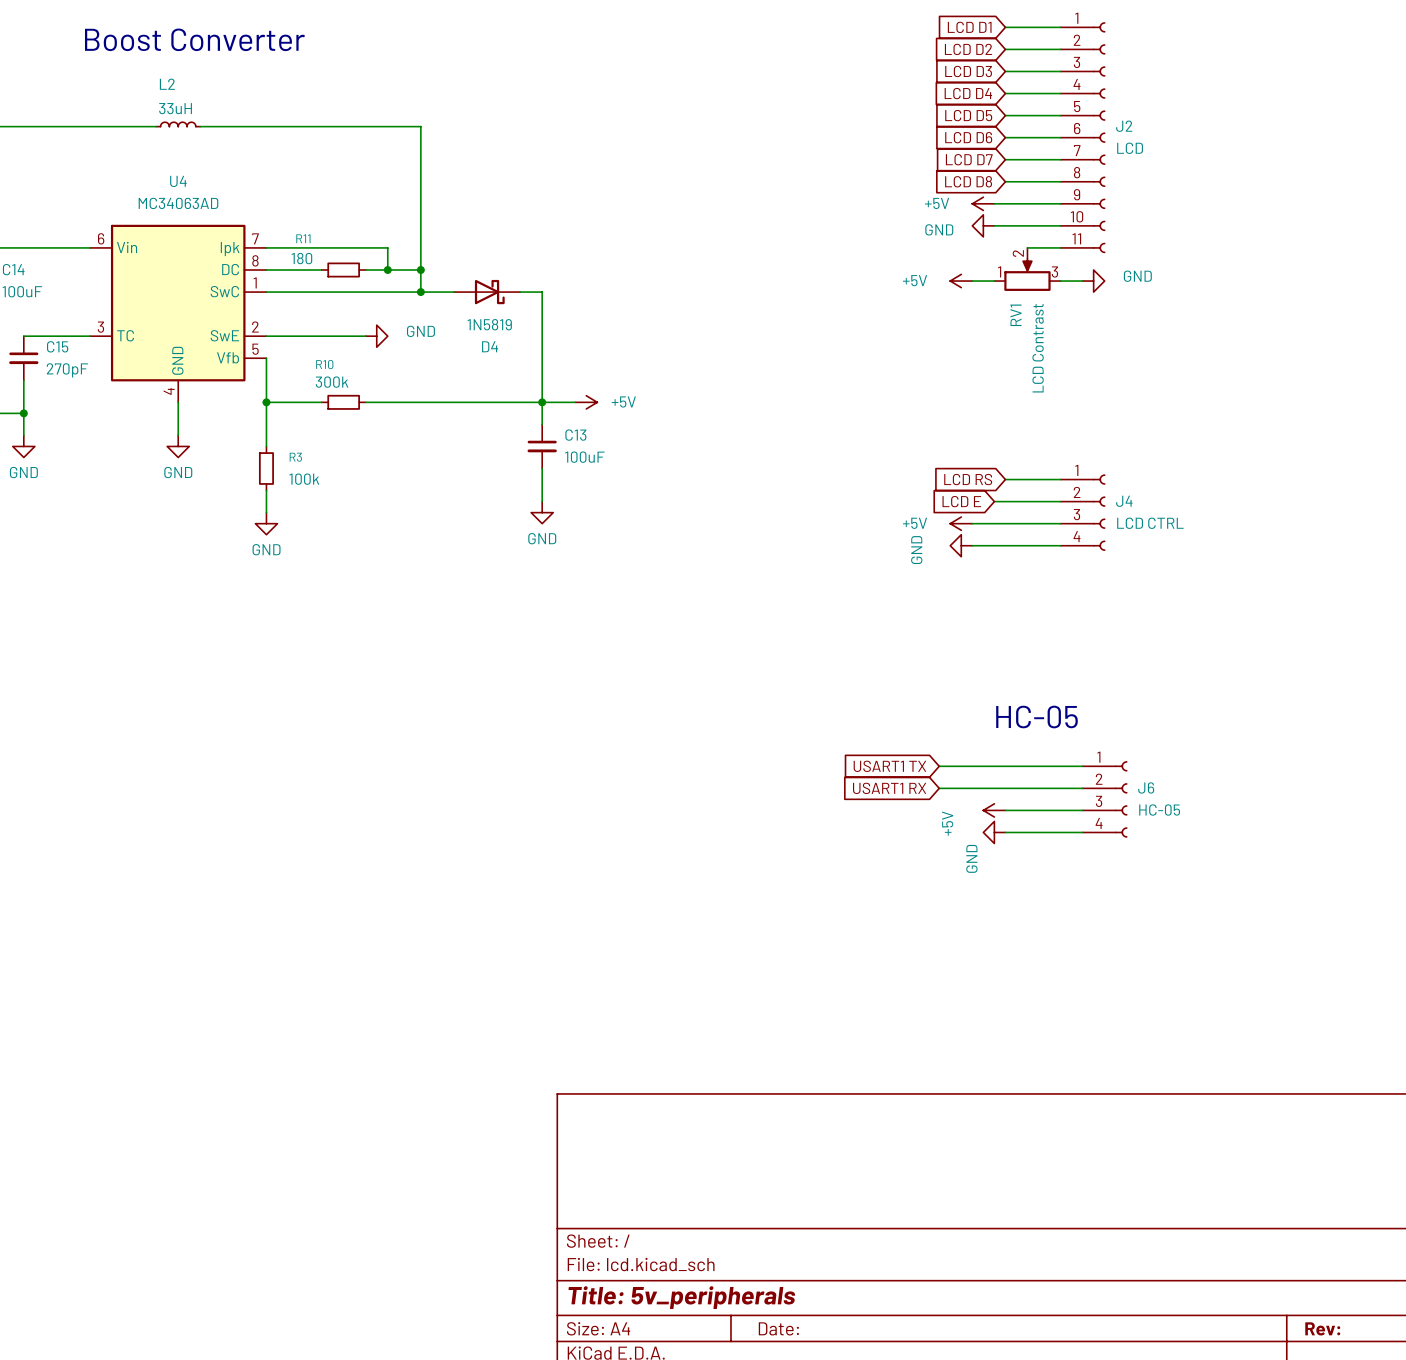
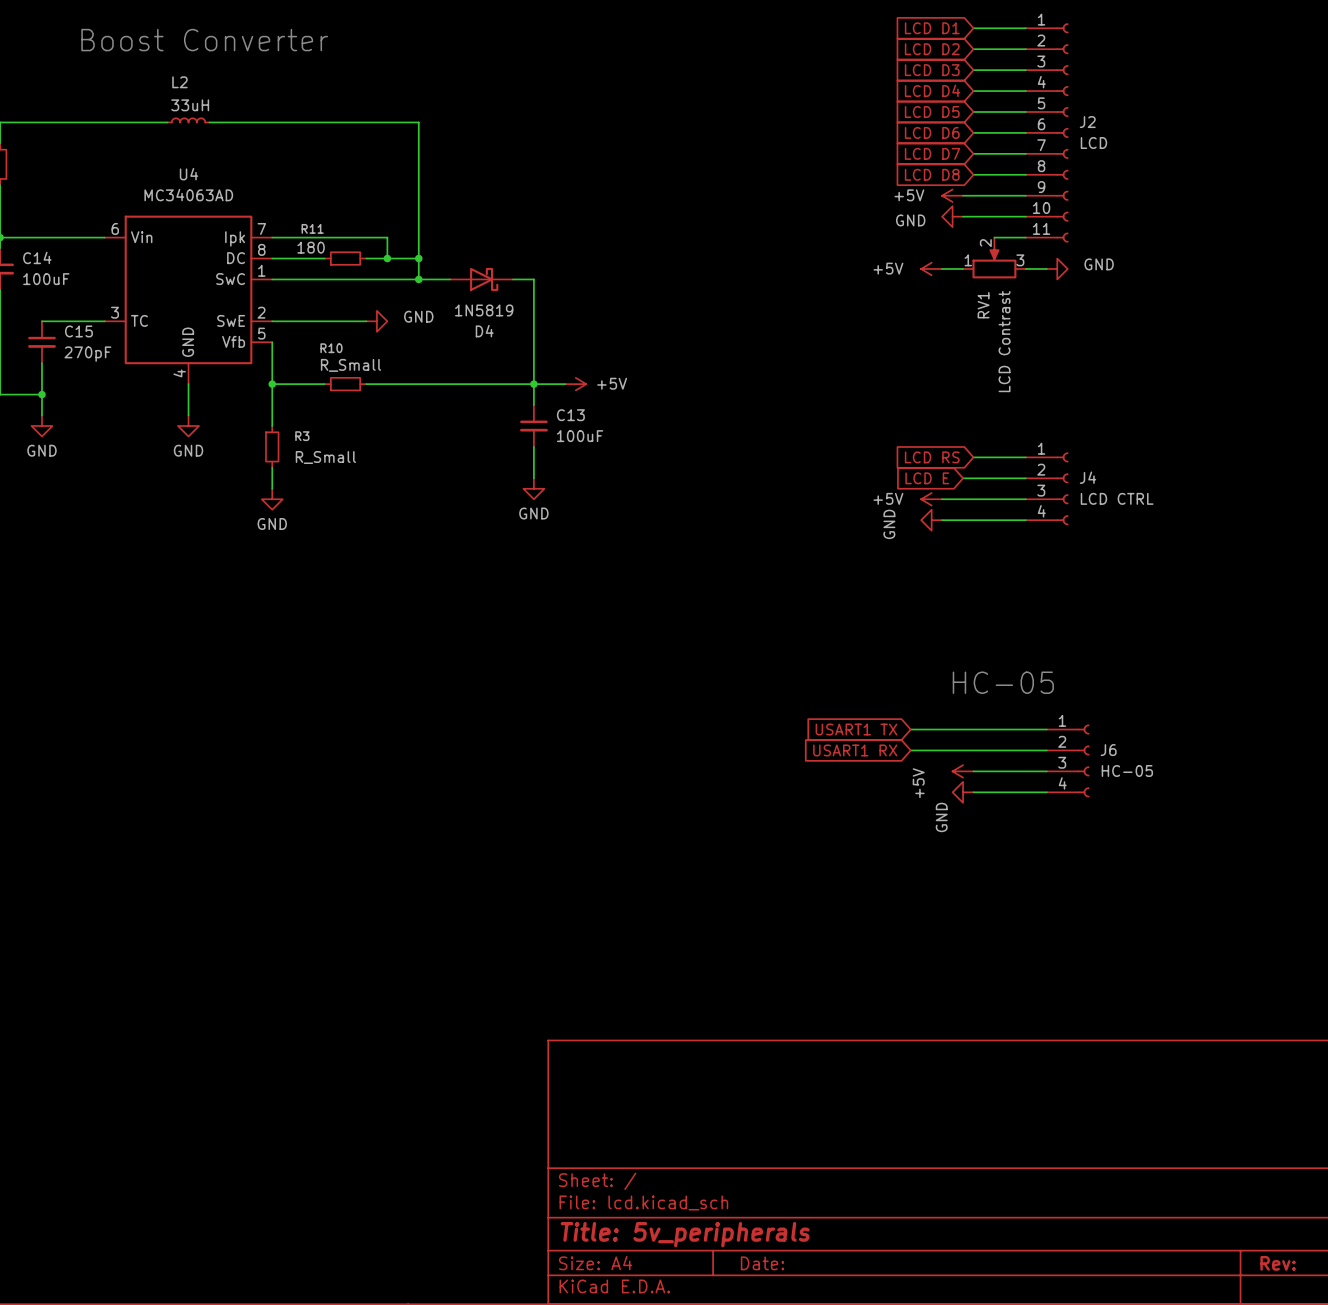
R10 value: 300k (332, 382) -> R_Small (351, 365)
R3 value: 100k (304, 479) -> R_Small (325, 457)

